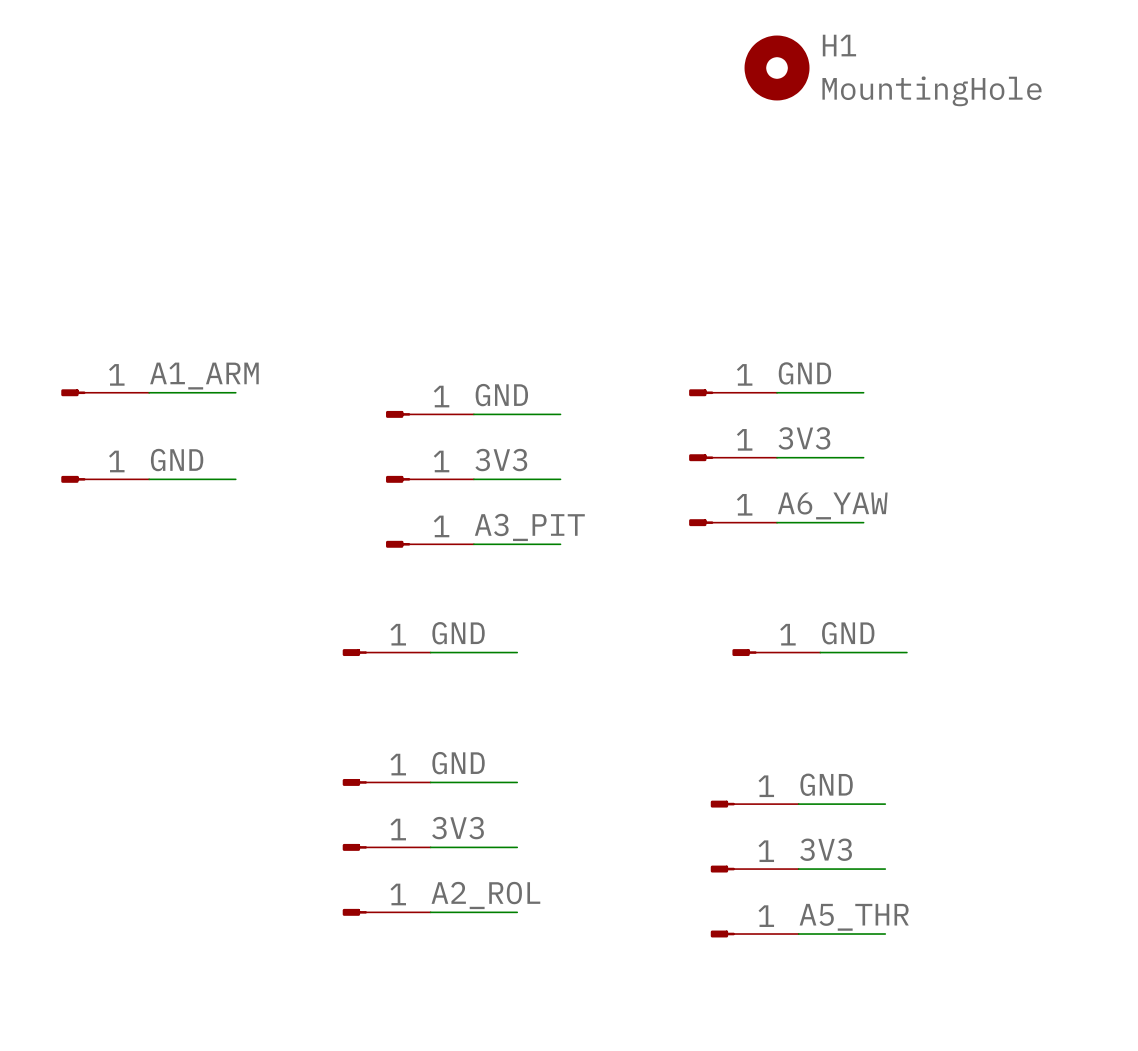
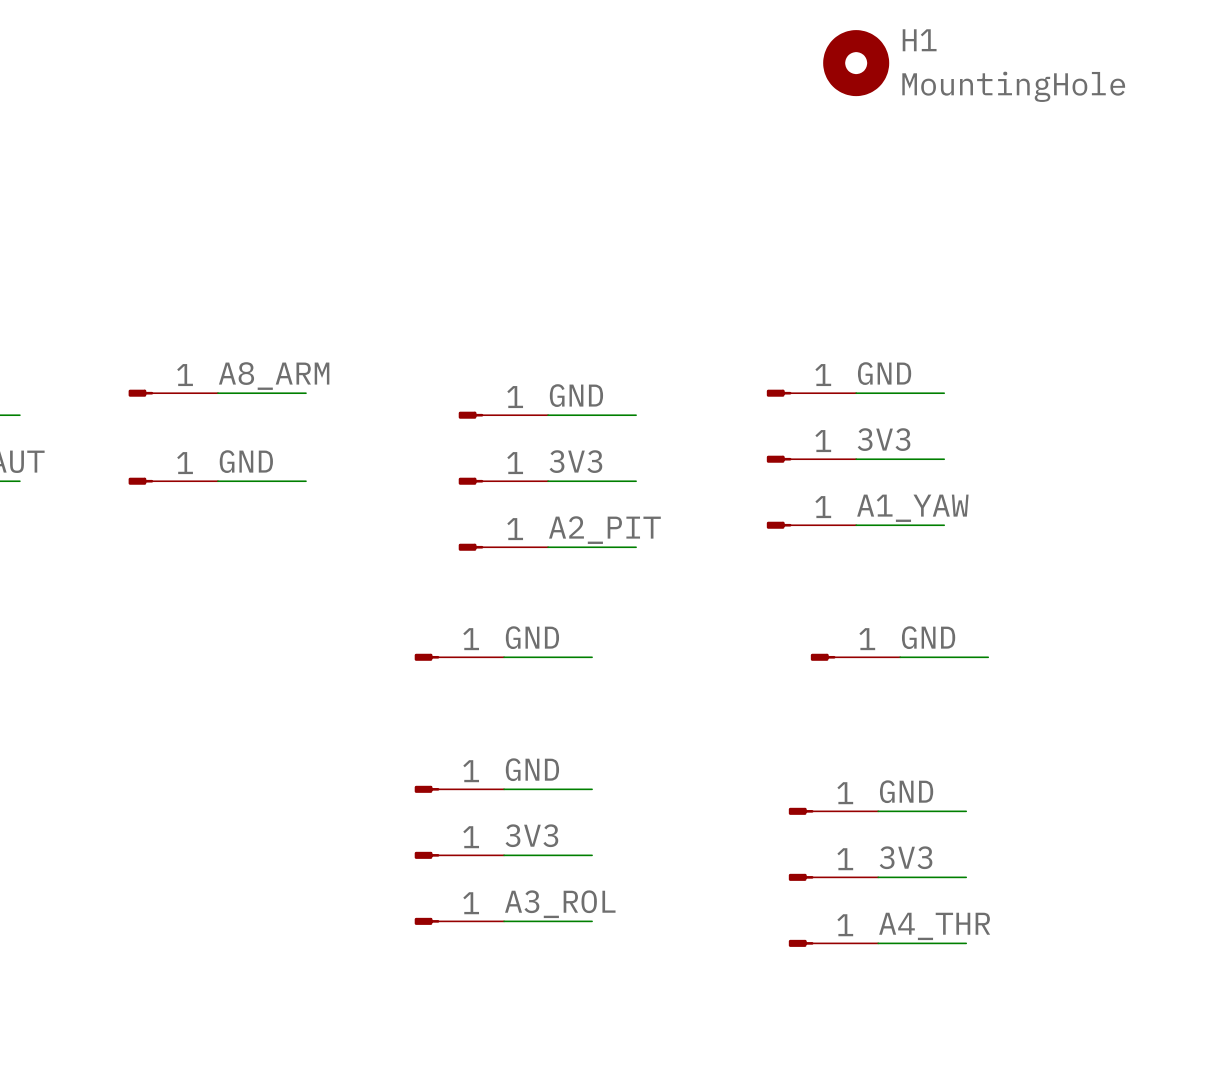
label: A1_ARM (204, 376) -> A8_ARM (274, 376)
label: A6_YAW (832, 505) -> A1_YAW (912, 508)
label: A3_PIT (529, 527) -> A2_PIT (604, 530)
label: A2_ROL (485, 895) -> A3_ROL (560, 904)
label: A5_THR (854, 917) -> A4_THR (934, 926)

